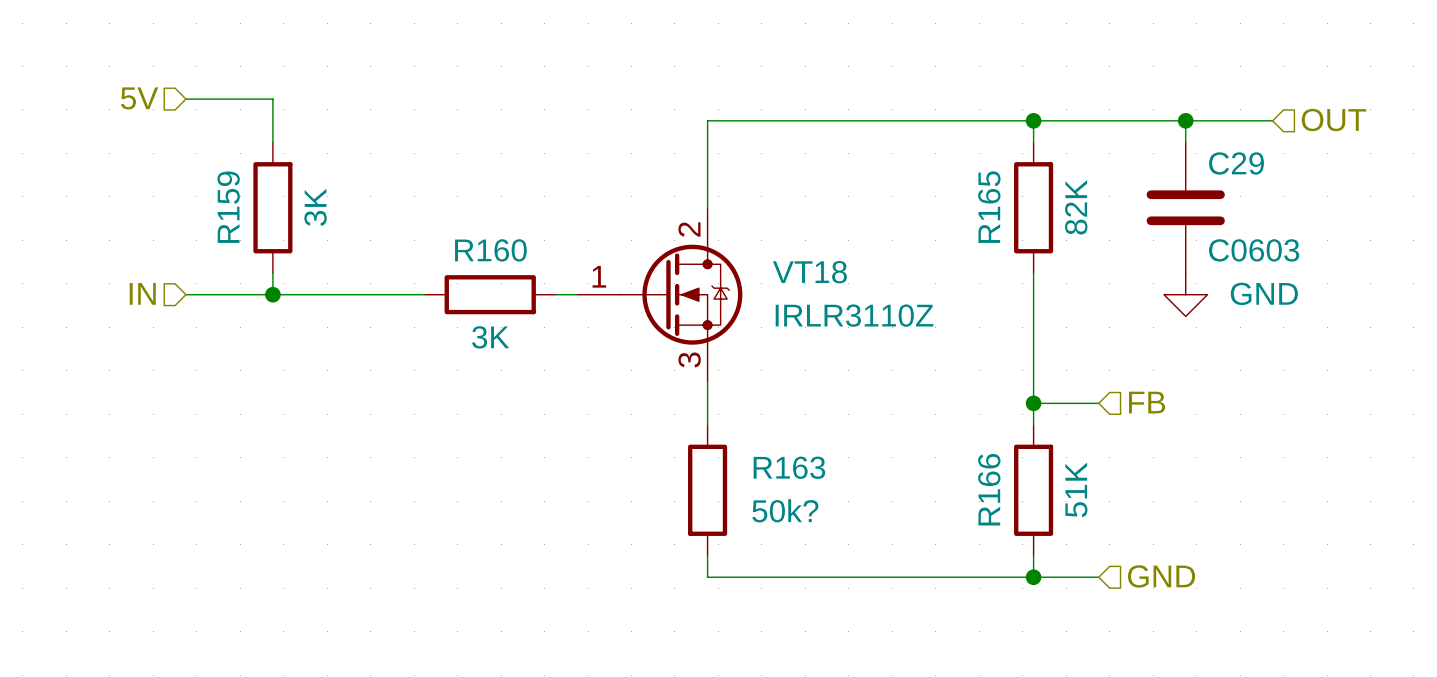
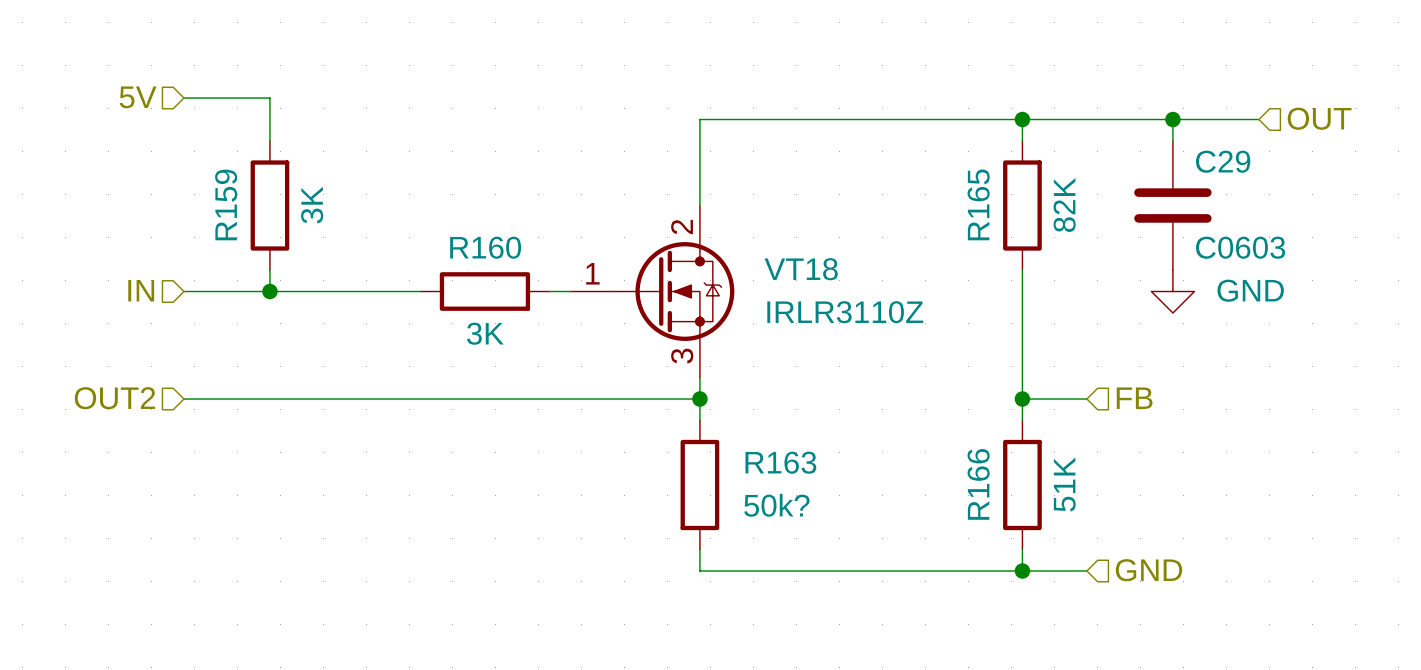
hierarchical label: none -> OUT2 (114, 398)
wire: none -> (183, 399) (699, 399)
junction: none -> (699, 399)

